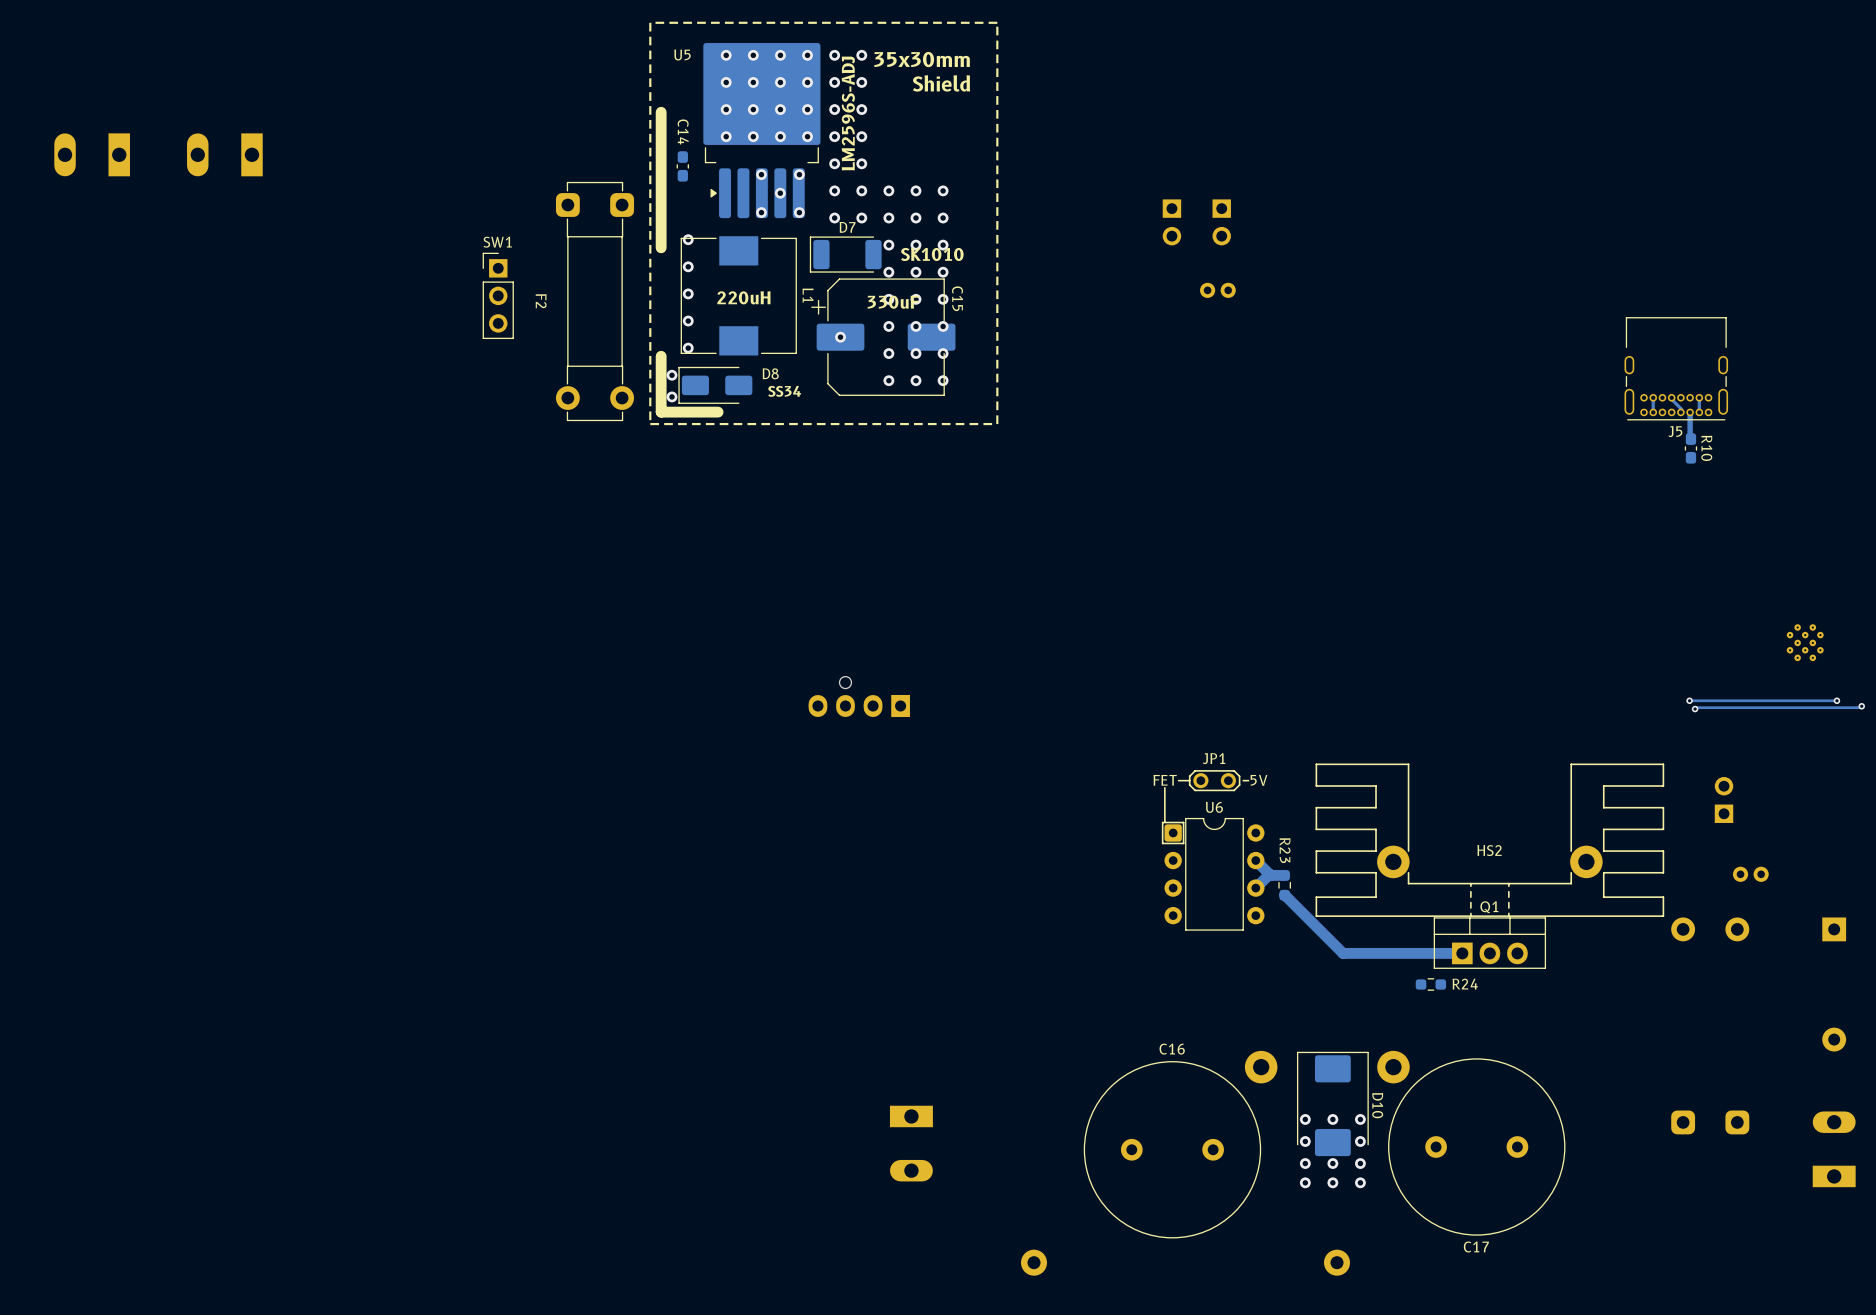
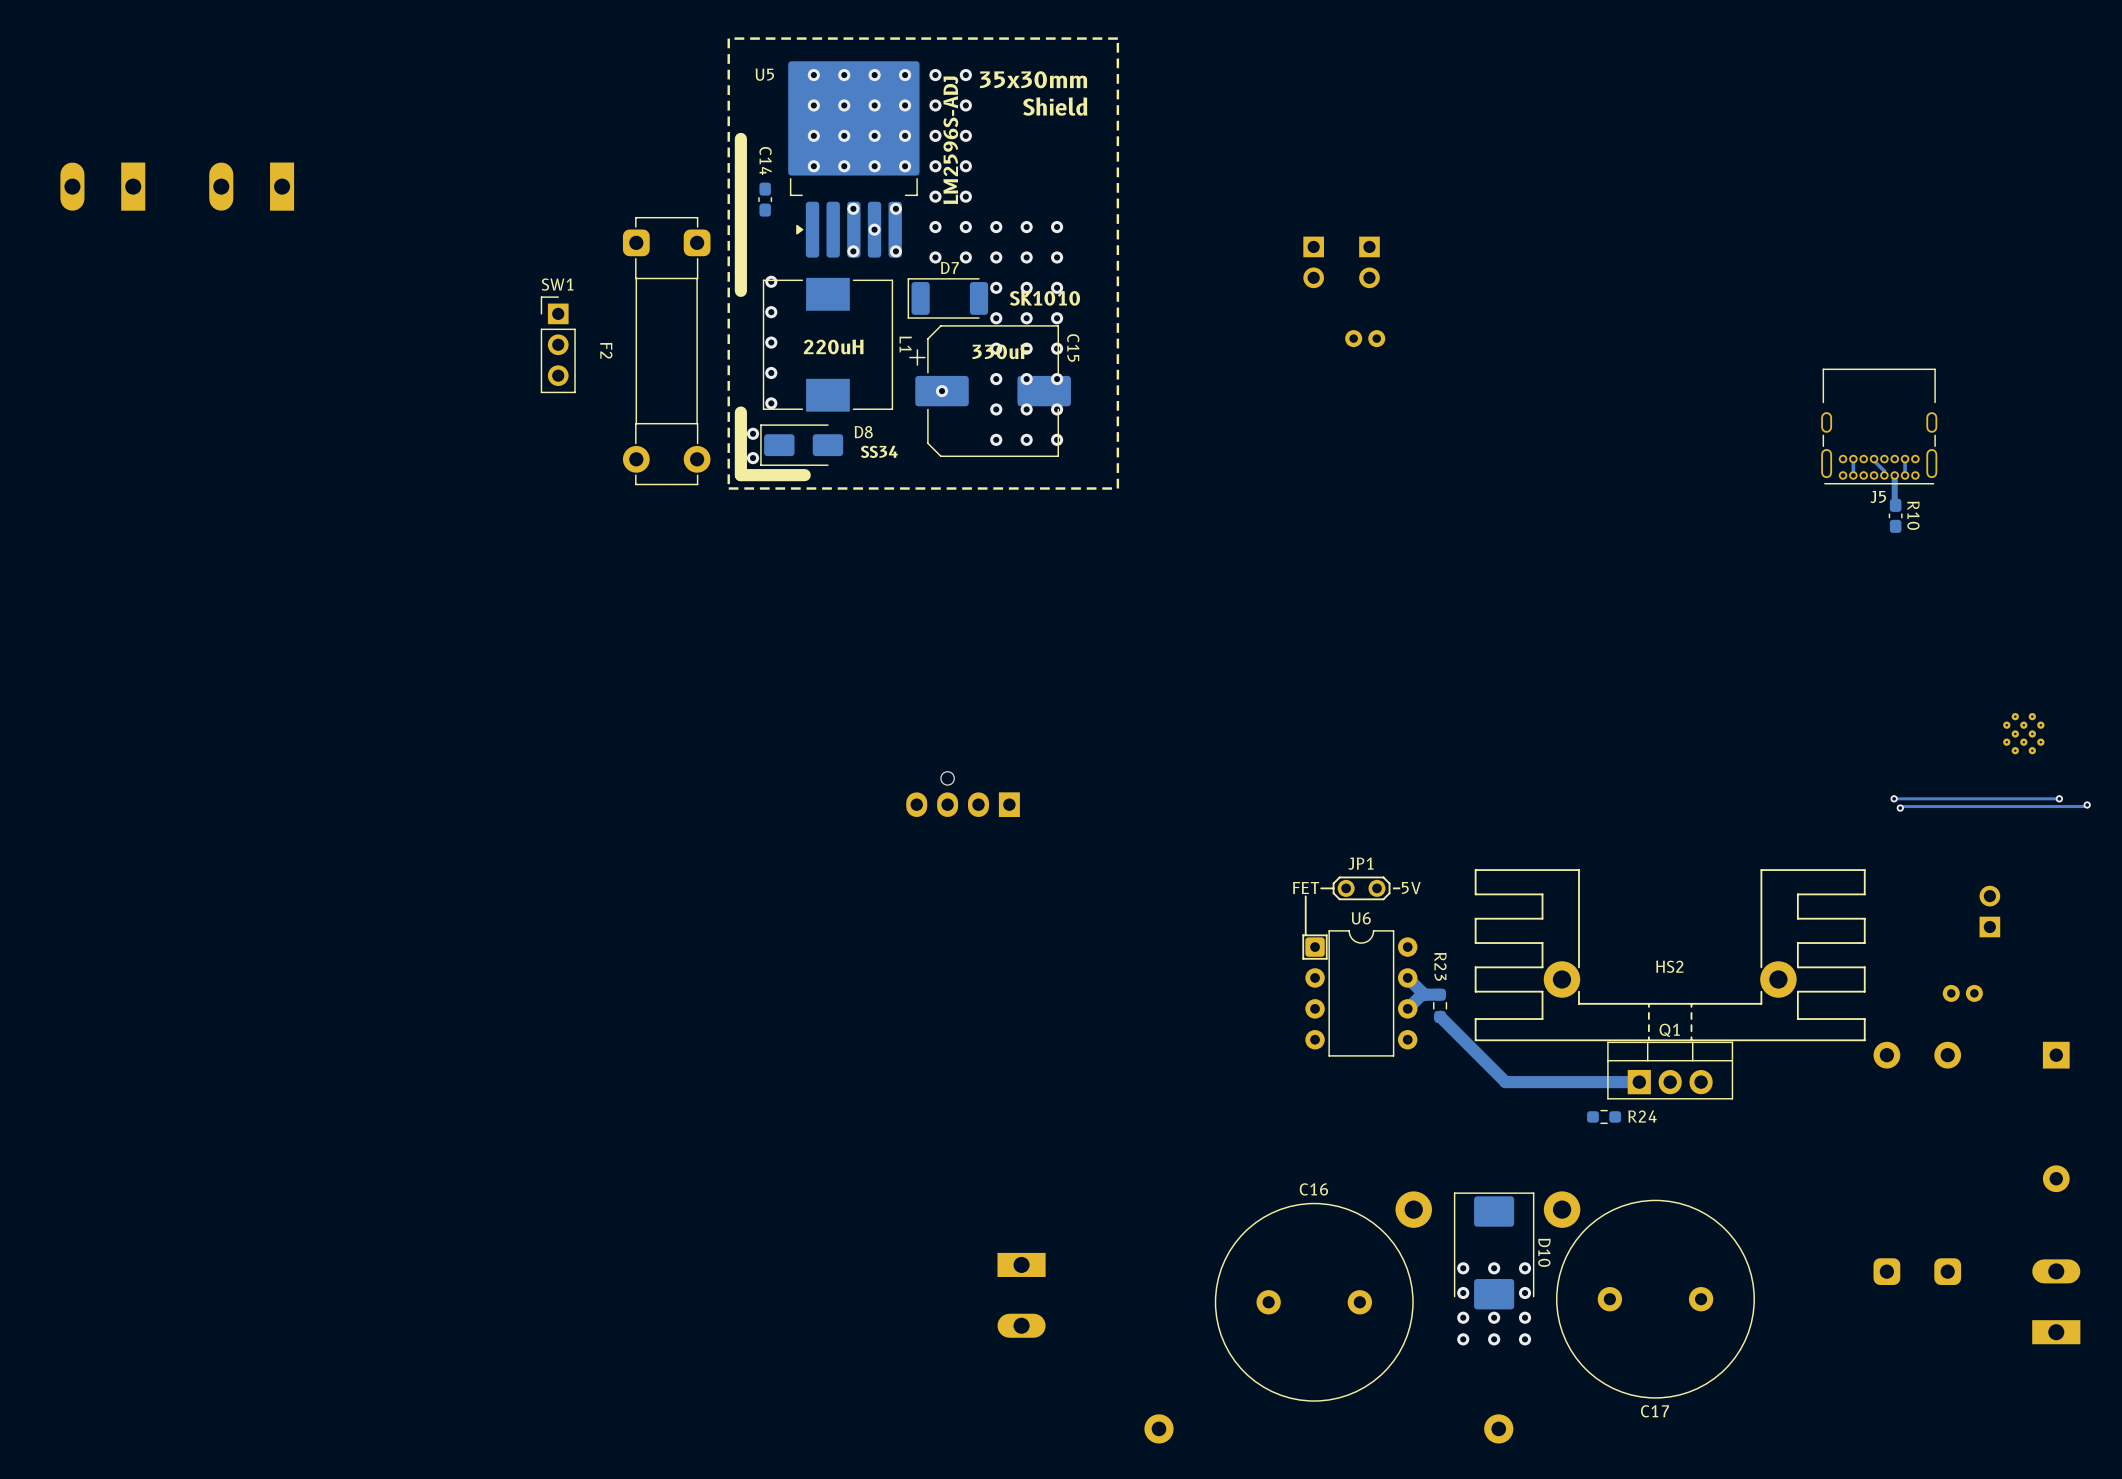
part position: (1724, 799) -> (1989, 911)

